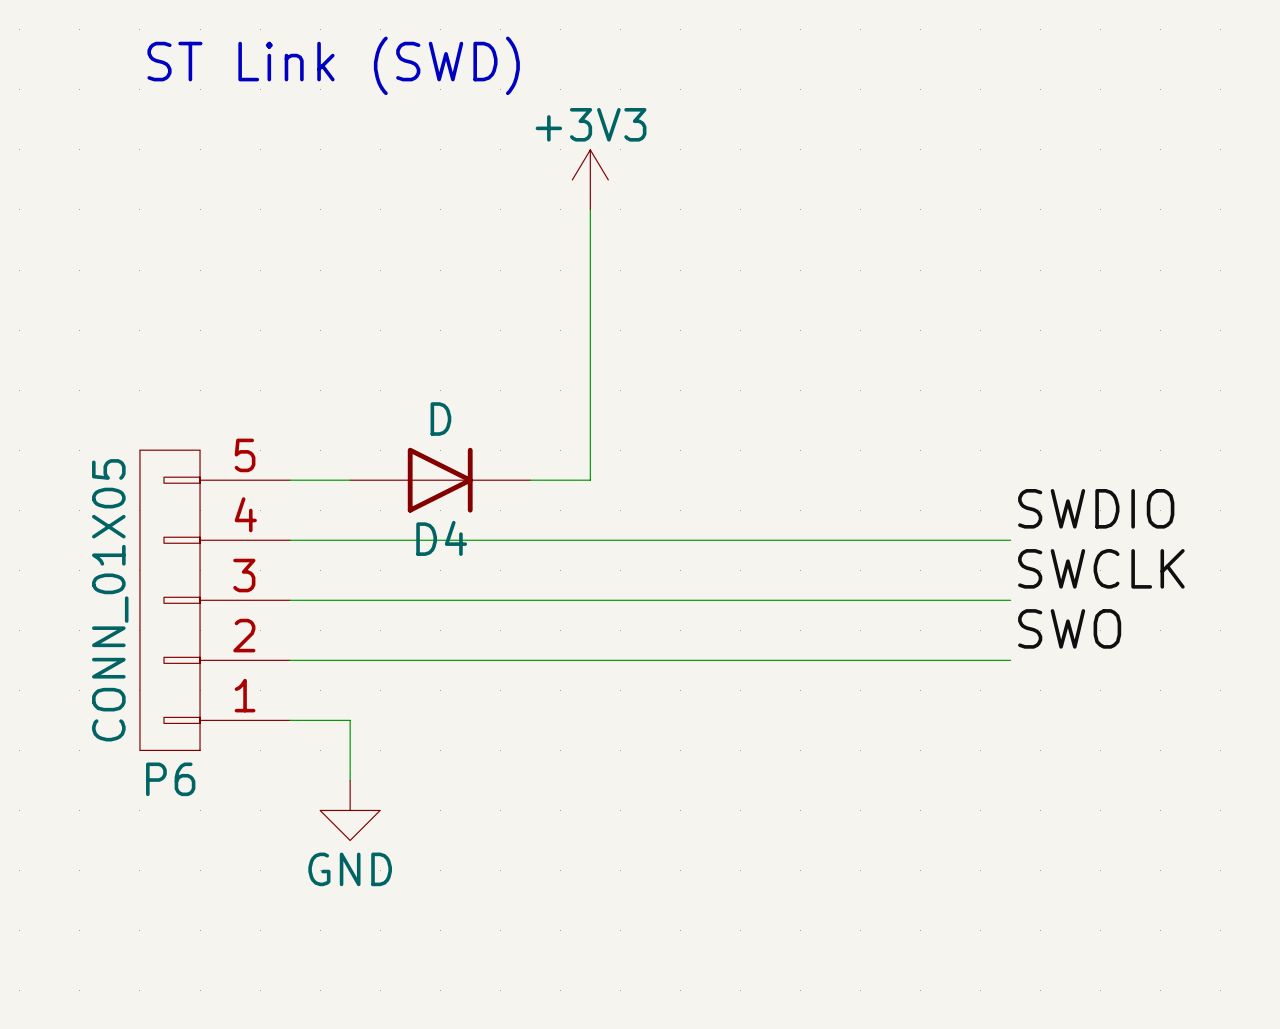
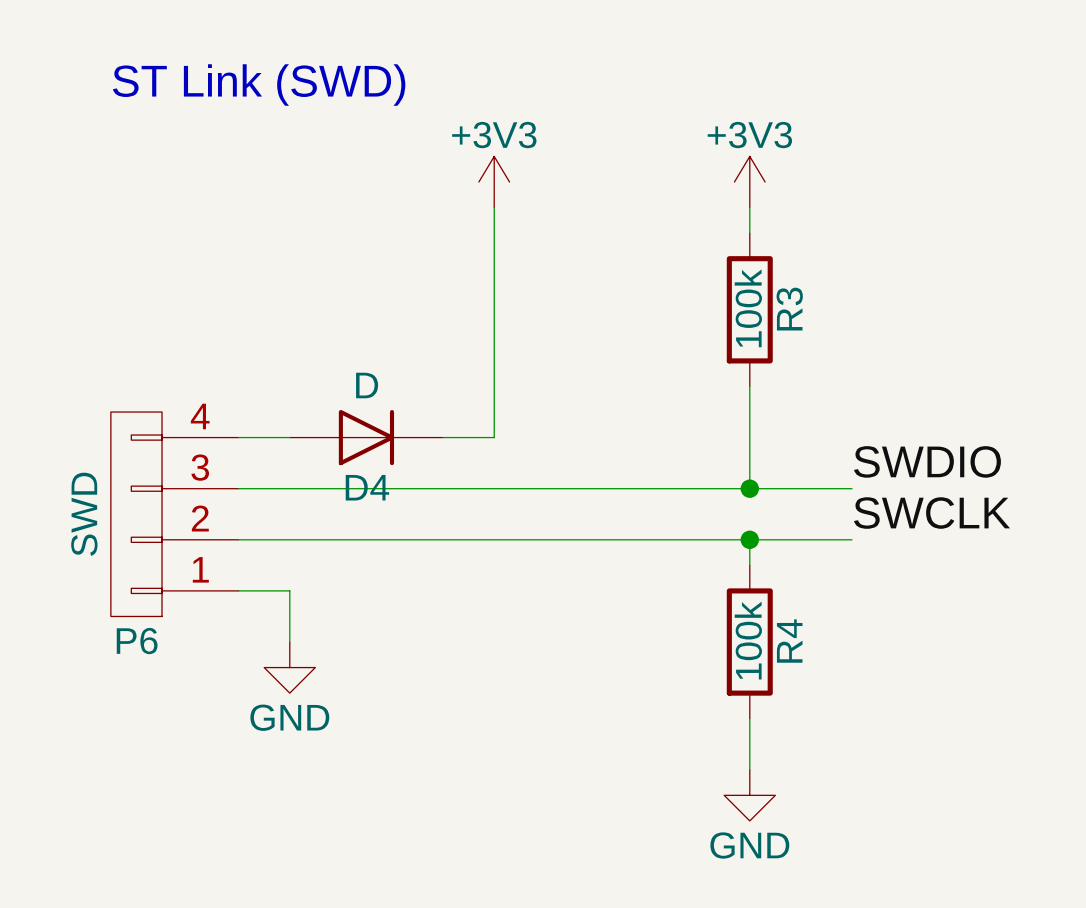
power symbol: none -> +3V3 (749, 182)
wire: none -> (749, 207) (749, 233)
R3: none -> 100k (749, 309)
wire: none -> (749, 386) (749, 488)
P6 symbol: [139, 450, 291, 751] -> [110, 412, 239, 617]
junction: none -> (749, 488)
P6 value: CONN_01X05 (110, 600) -> SWD (84, 514)
wire: none -> (749, 539) (749, 565)
junction: none -> (749, 539)
label: SWO (1069, 628) -> none
wire: (350, 660) (1010, 660) -> (289, 590) (289, 642)
wire: (290, 720) (350, 720) (350, 780) -> none
R4: none -> 100k (749, 642)
power symbol position: GND (350, 810) -> GND (289, 667)
wire: none -> (749, 718) (749, 769)
power symbol: none -> GND (749, 795)

